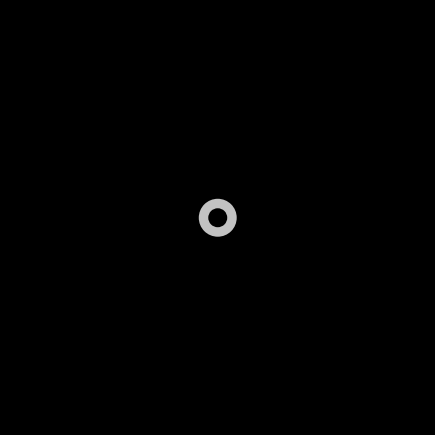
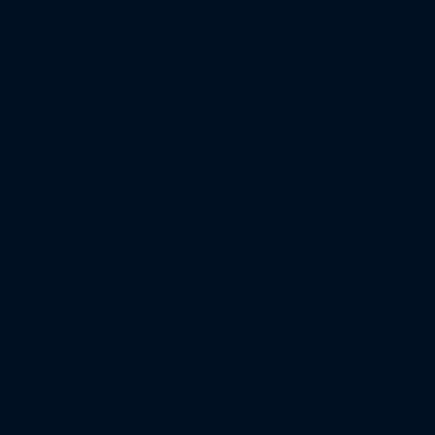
via: (217, 217) -> none

